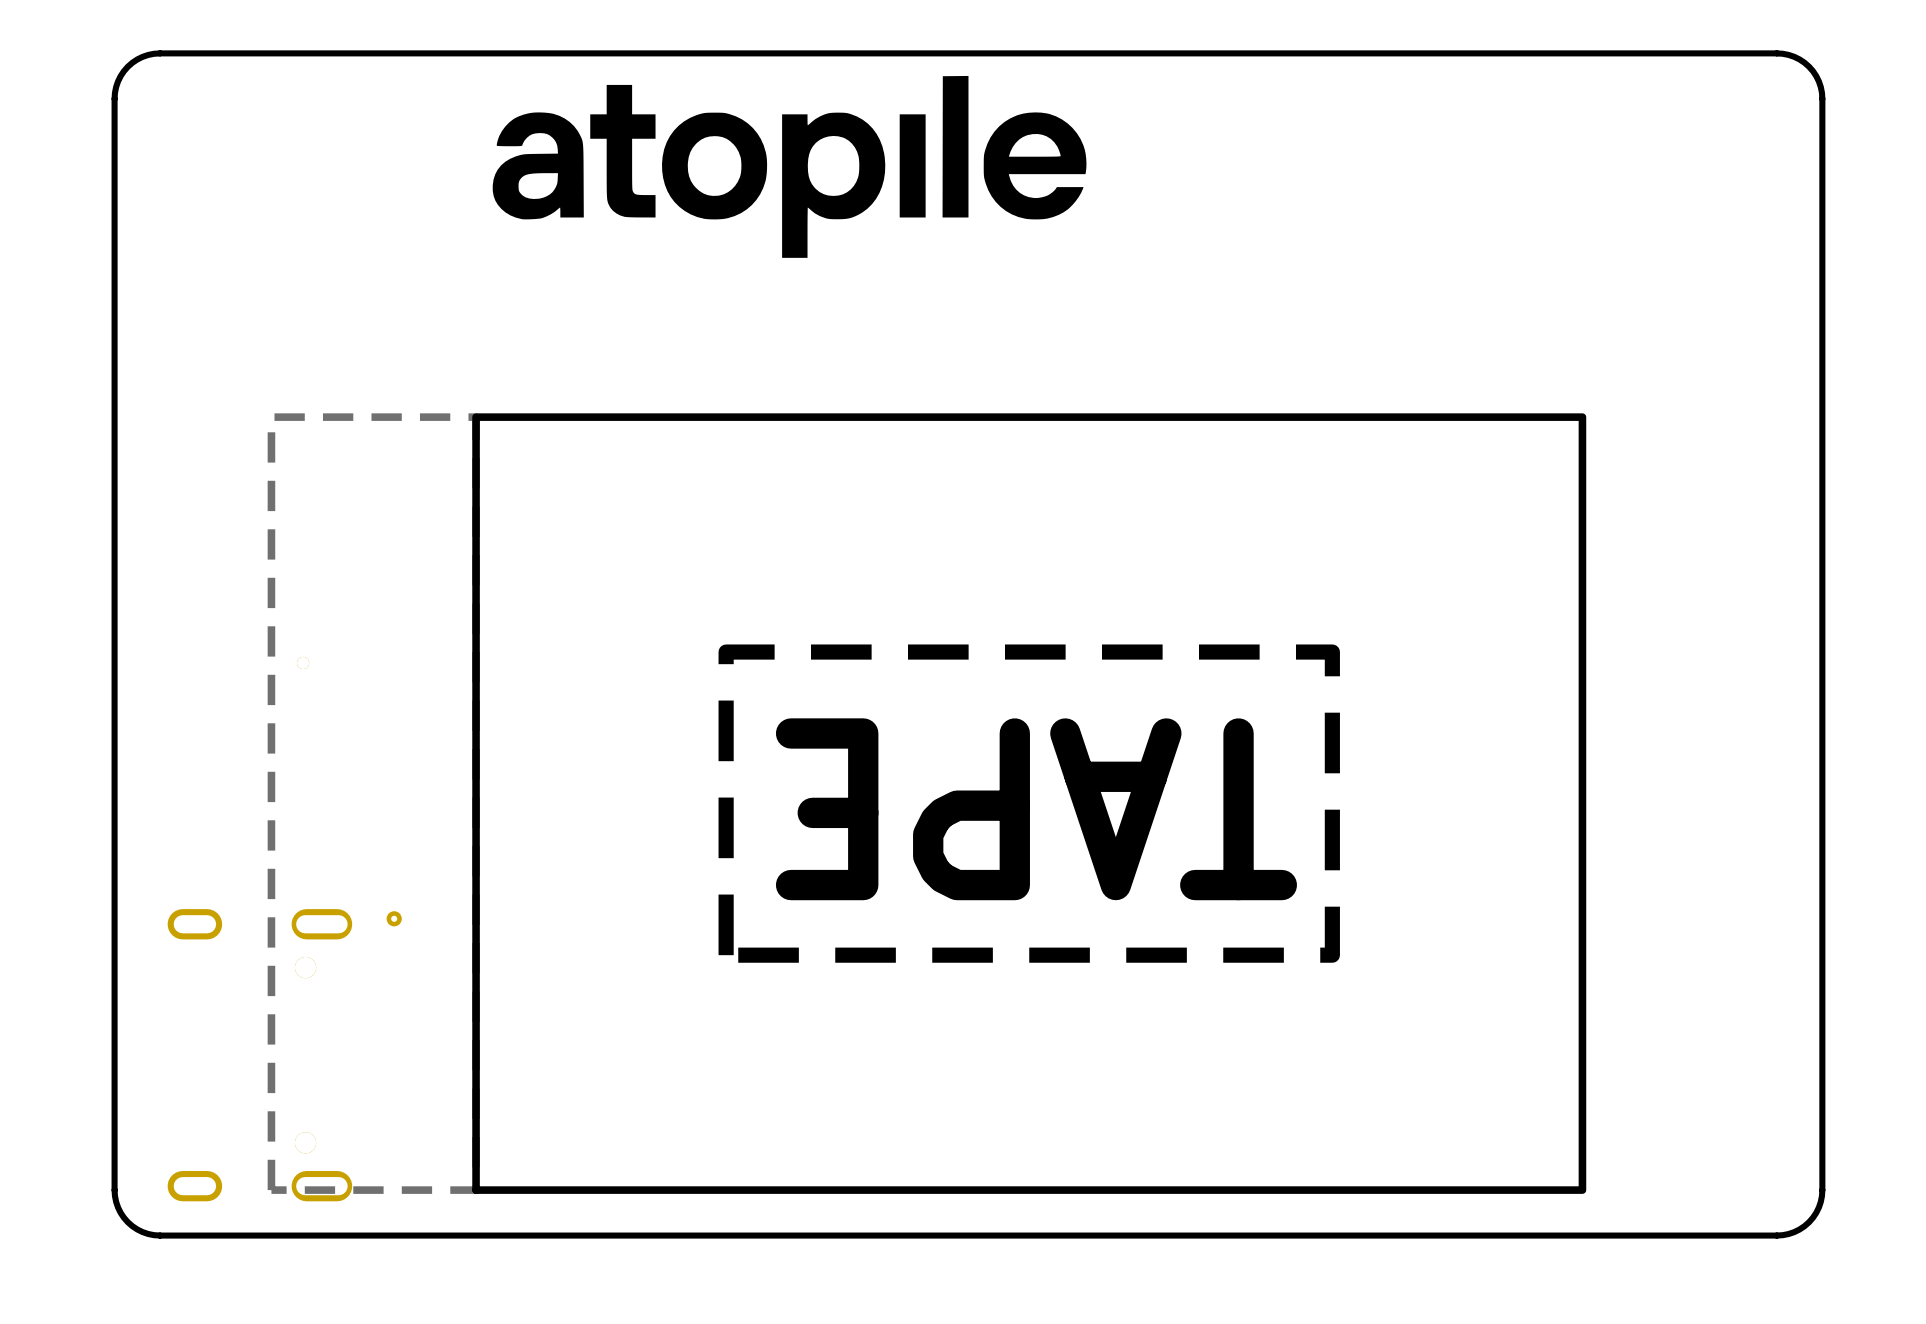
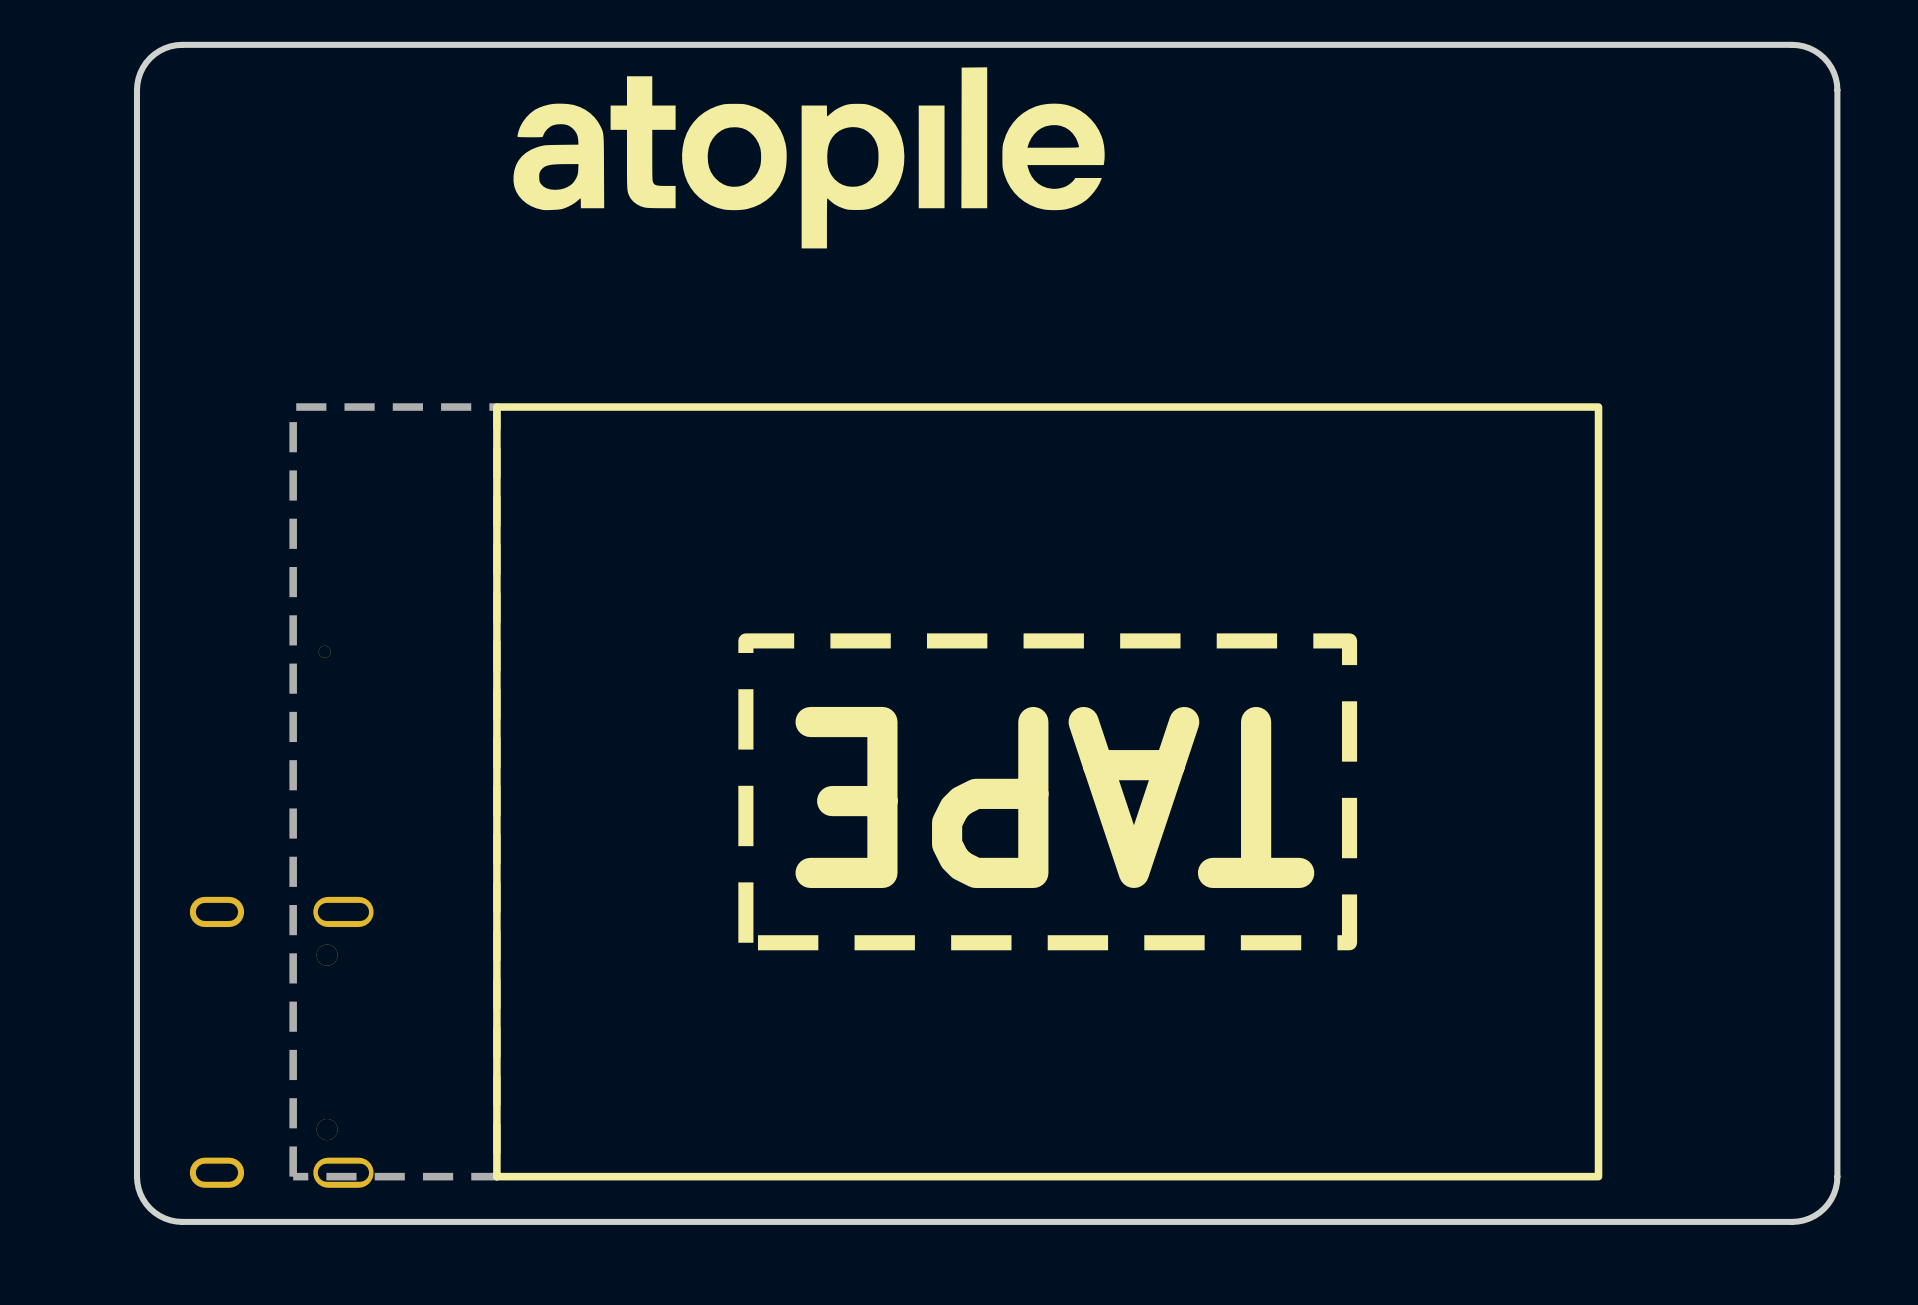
part: (394, 918) -> none

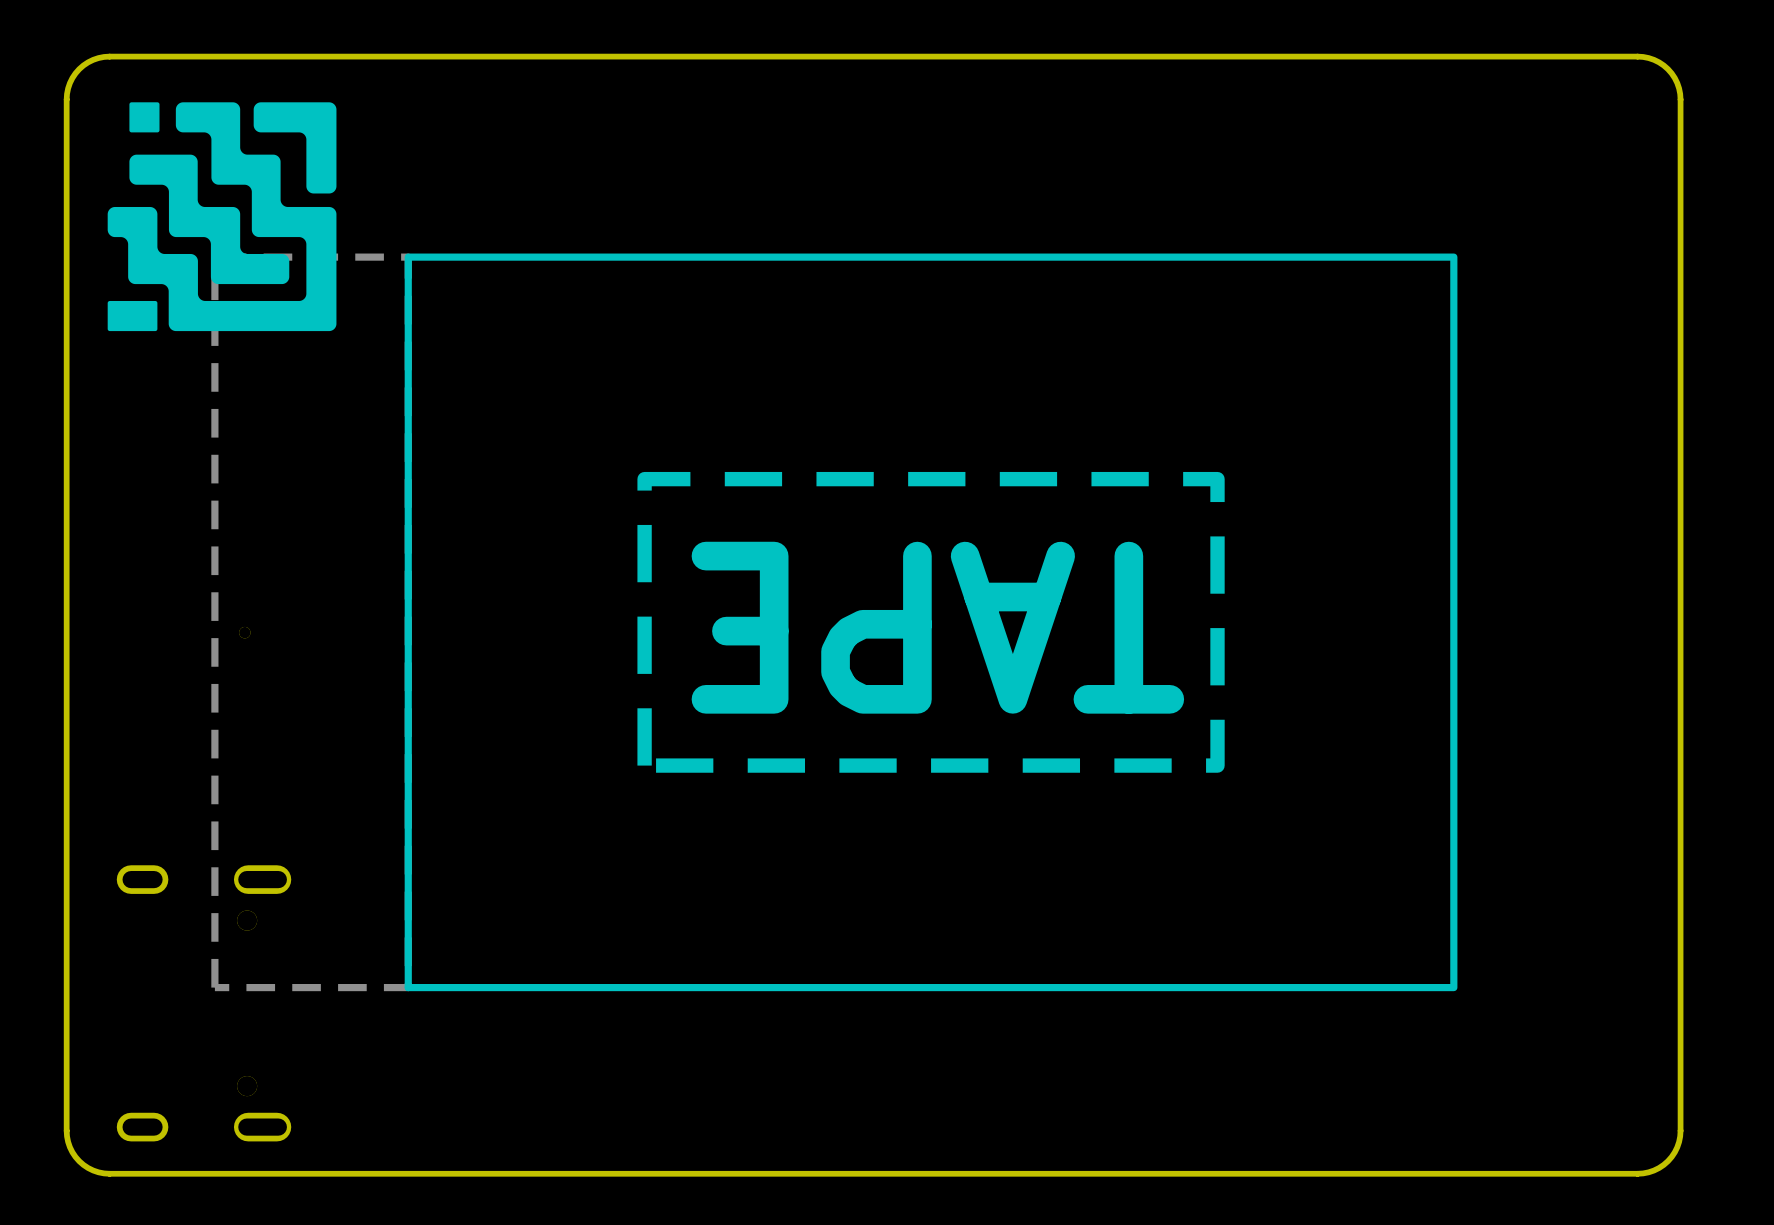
drawing: [513, 67, 1105, 249] -> none
drawing: none -> [107, 102, 337, 332]
drawing position: (945, 791) -> (834, 622)

